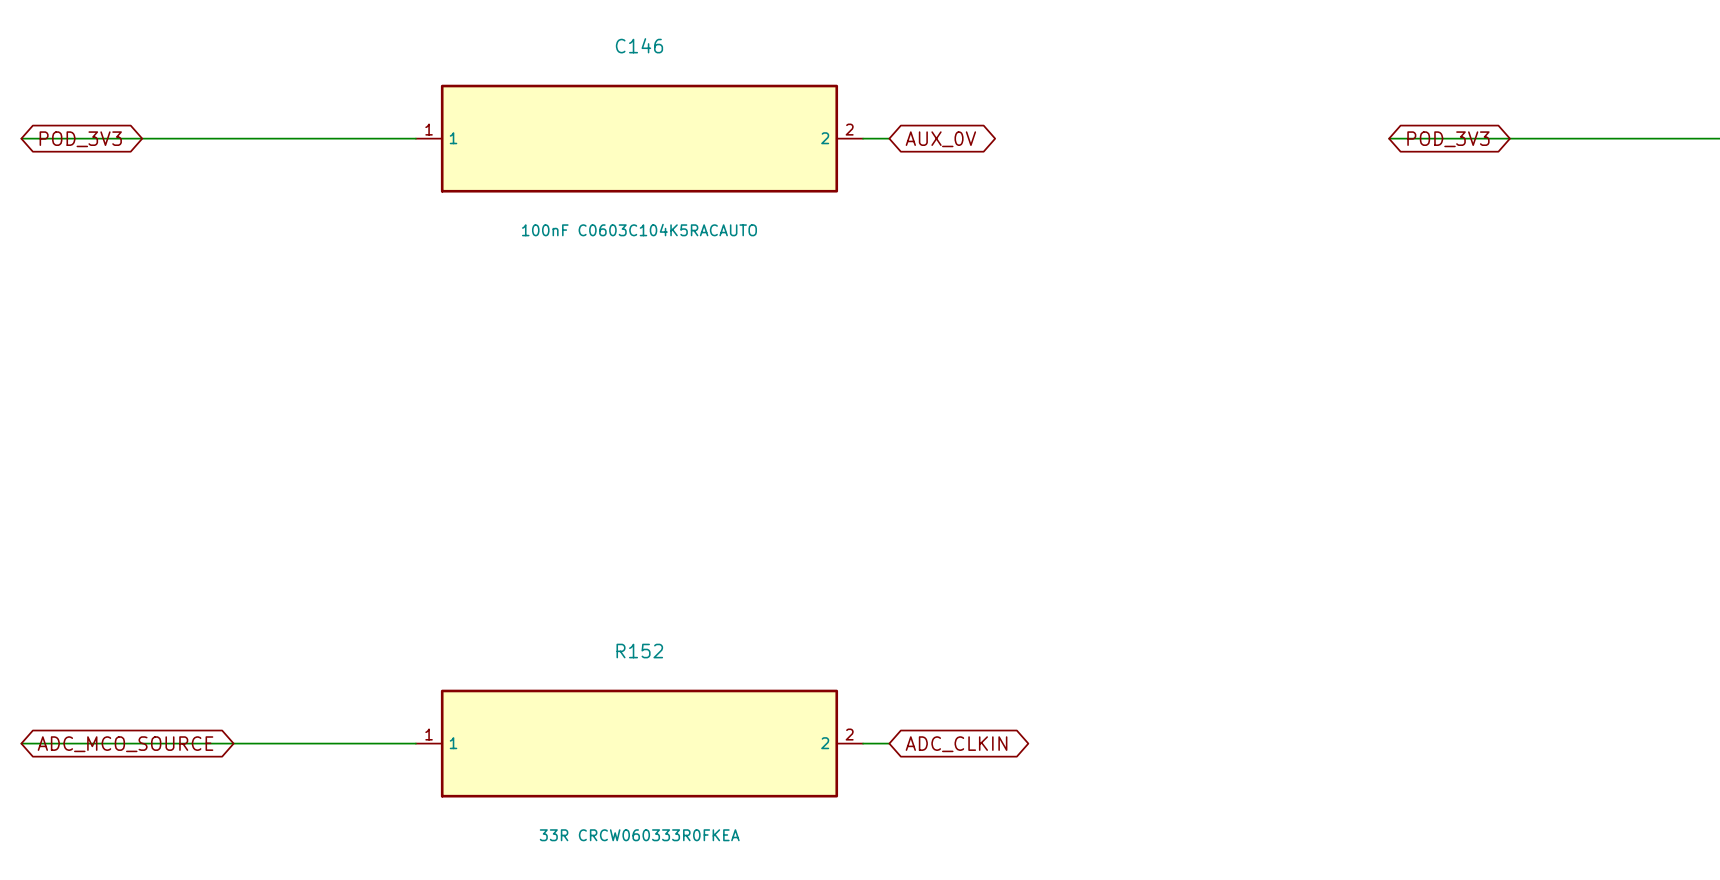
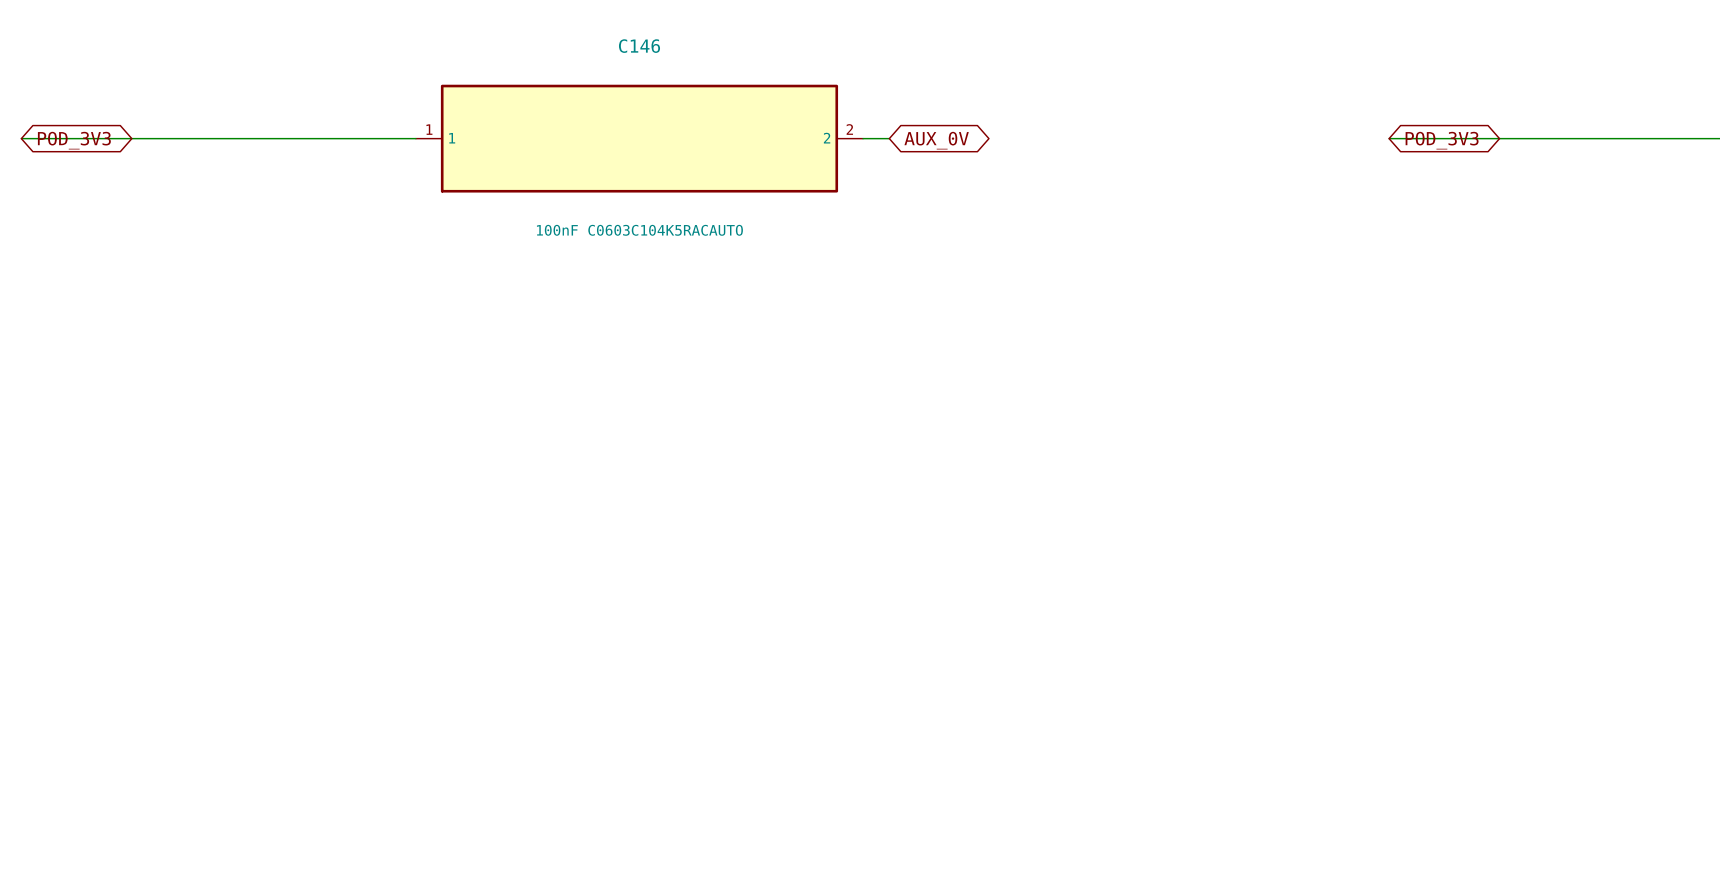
wire: (21, 743) (415, 743) -> none
R152: 33R CRCW060333R0FKEA (639, 743) -> none
wire: (863, 743) (889, 743) -> none
global label: ADC_MCO_SOURCE (125, 744) -> none
global label: ADC_CLKIN (956, 744) -> none

